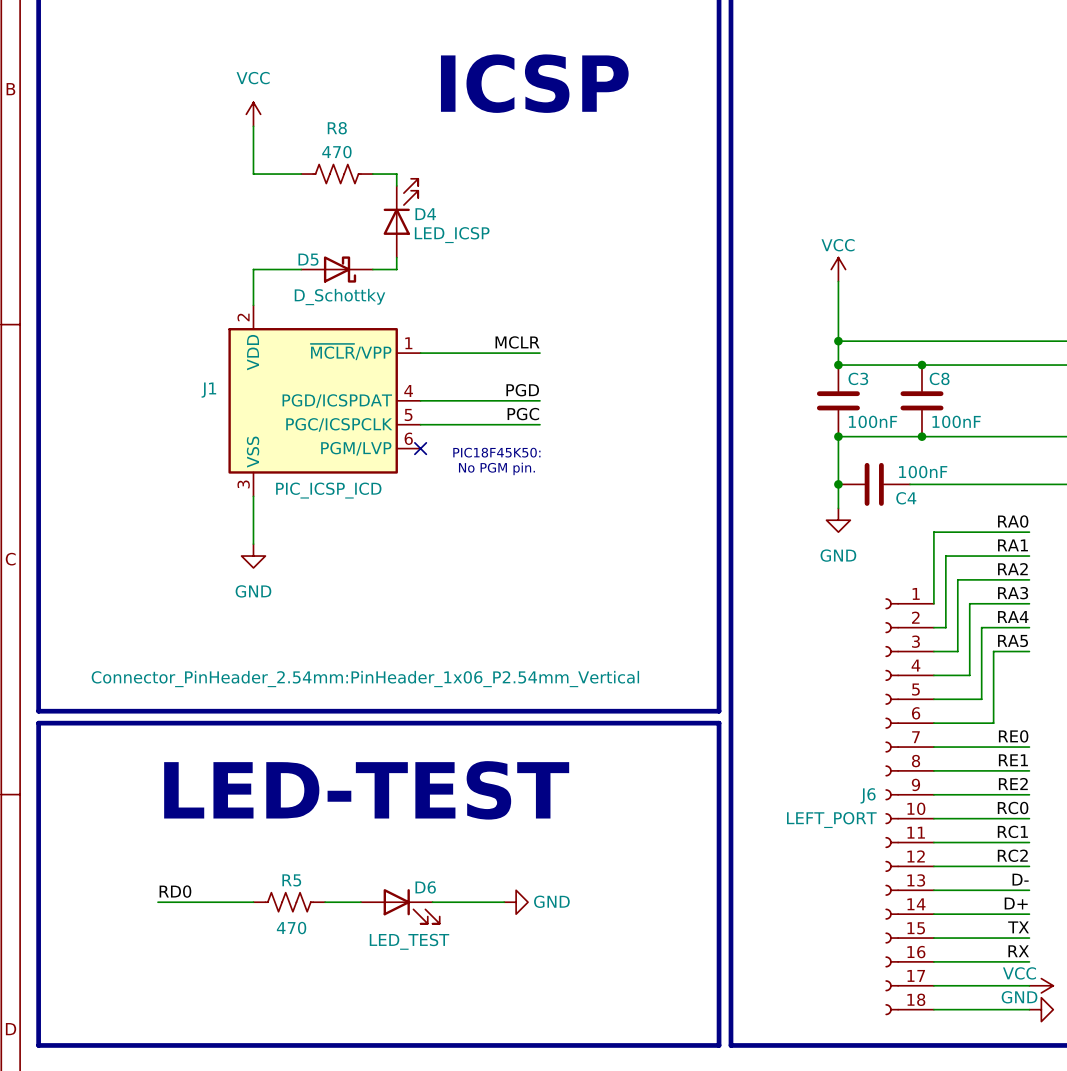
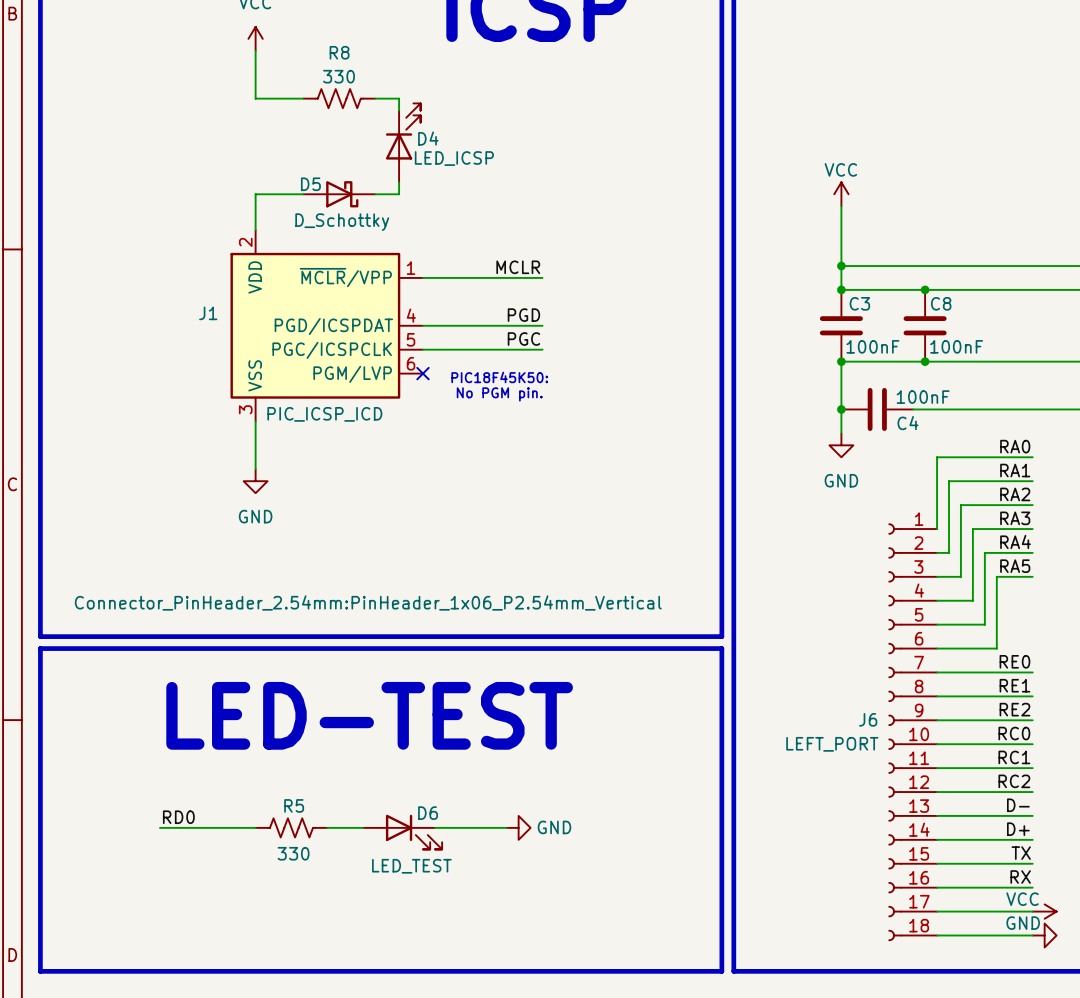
R8 value: 470 (336, 152) -> 330 (339, 76)
R5 value: 470 (291, 928) -> 330 (293, 853)

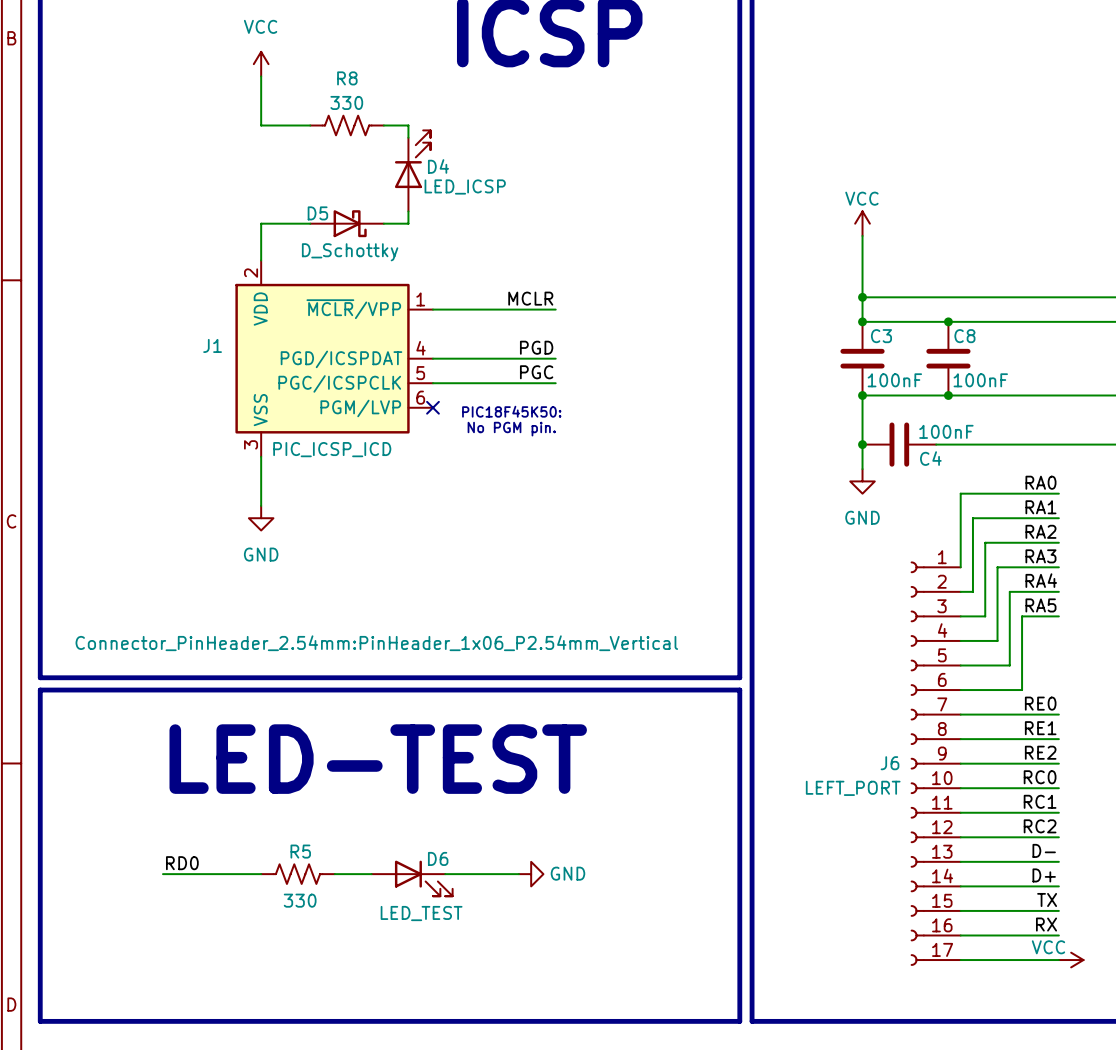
J6 symbol: [888, 523, 938, 941] -> [910, 561, 961, 966]
wire: (937, 935) (1032, 935) -> none
power symbol: GND (1044, 935) -> none

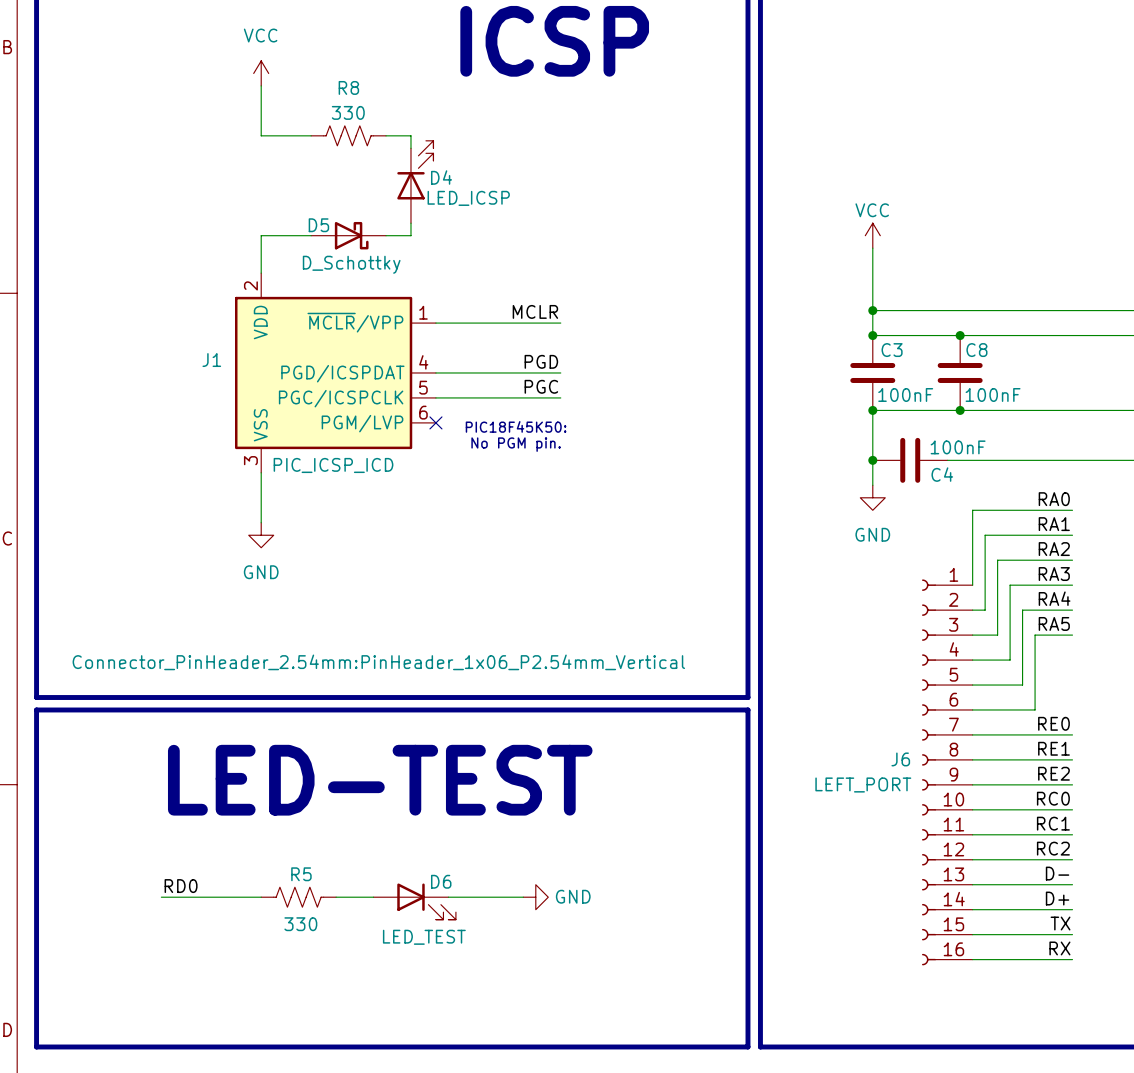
J6 symbol: [910, 561, 961, 966] -> [921, 579, 973, 966]
wire: (960, 960) (1058, 960) -> none
power symbol: VCC (1071, 960) -> none

